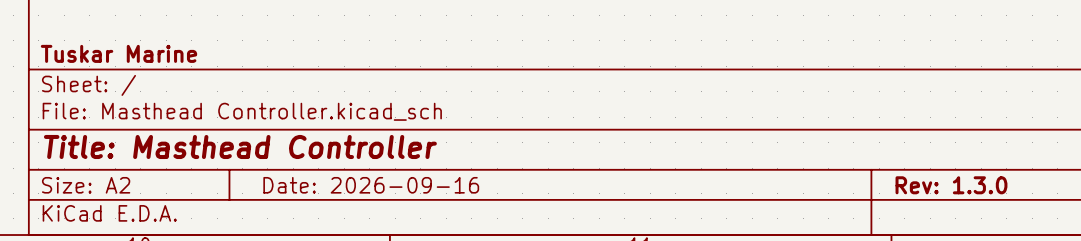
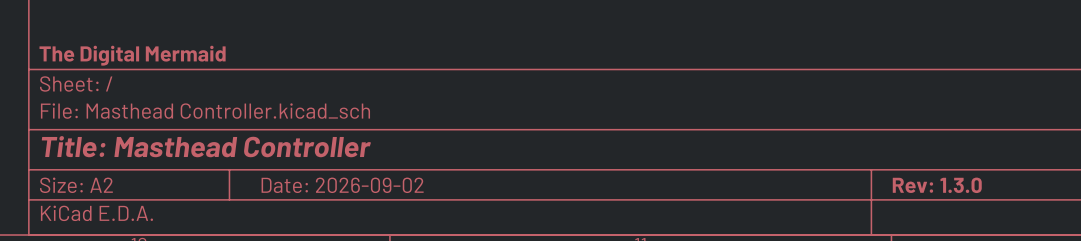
title block: Tuskar Marine (118, 53) -> The Digital Mermaid (132, 55)
title block: Date: 2026-09-16 (371, 185) -> Date: 2026-09-02 (342, 185)

